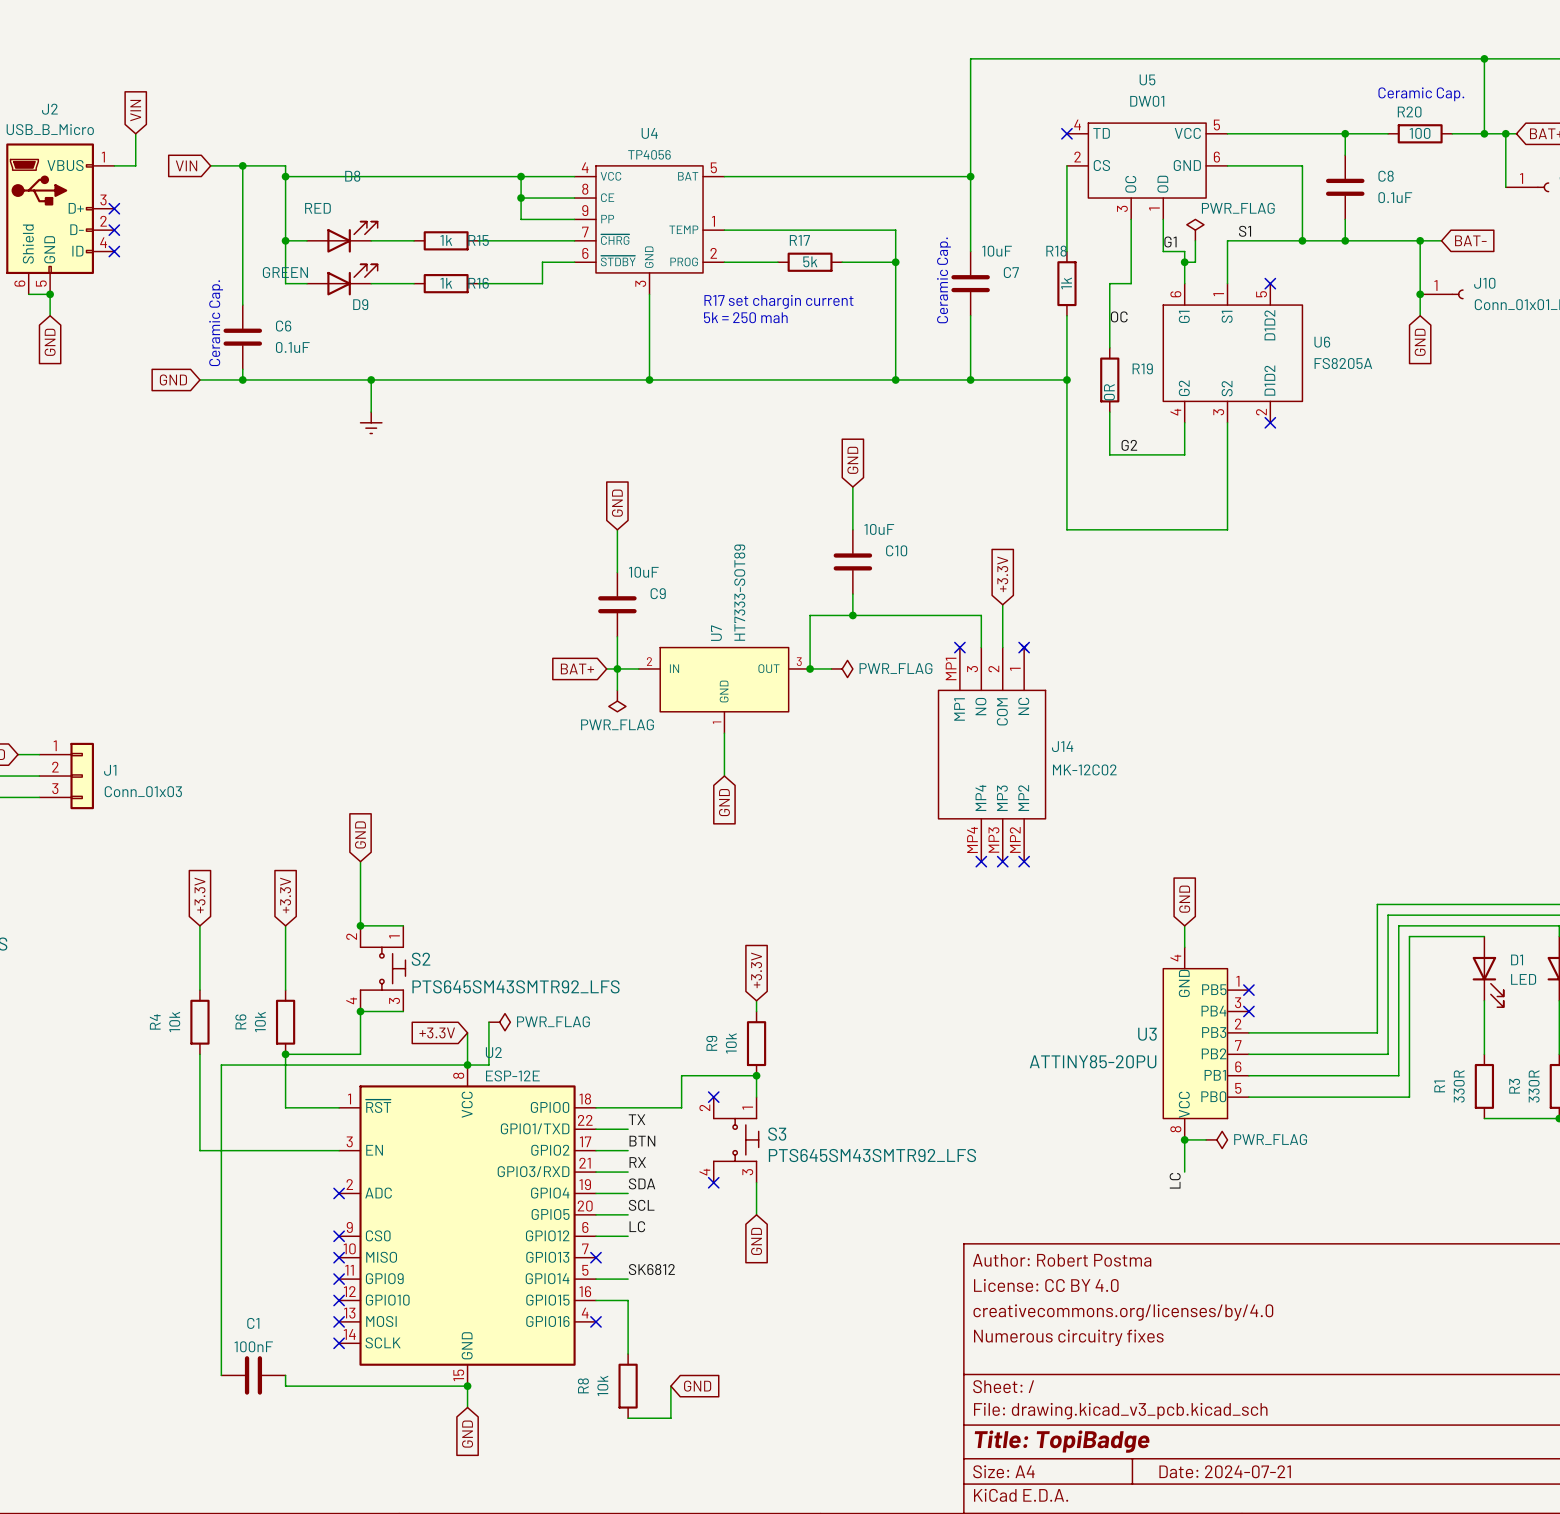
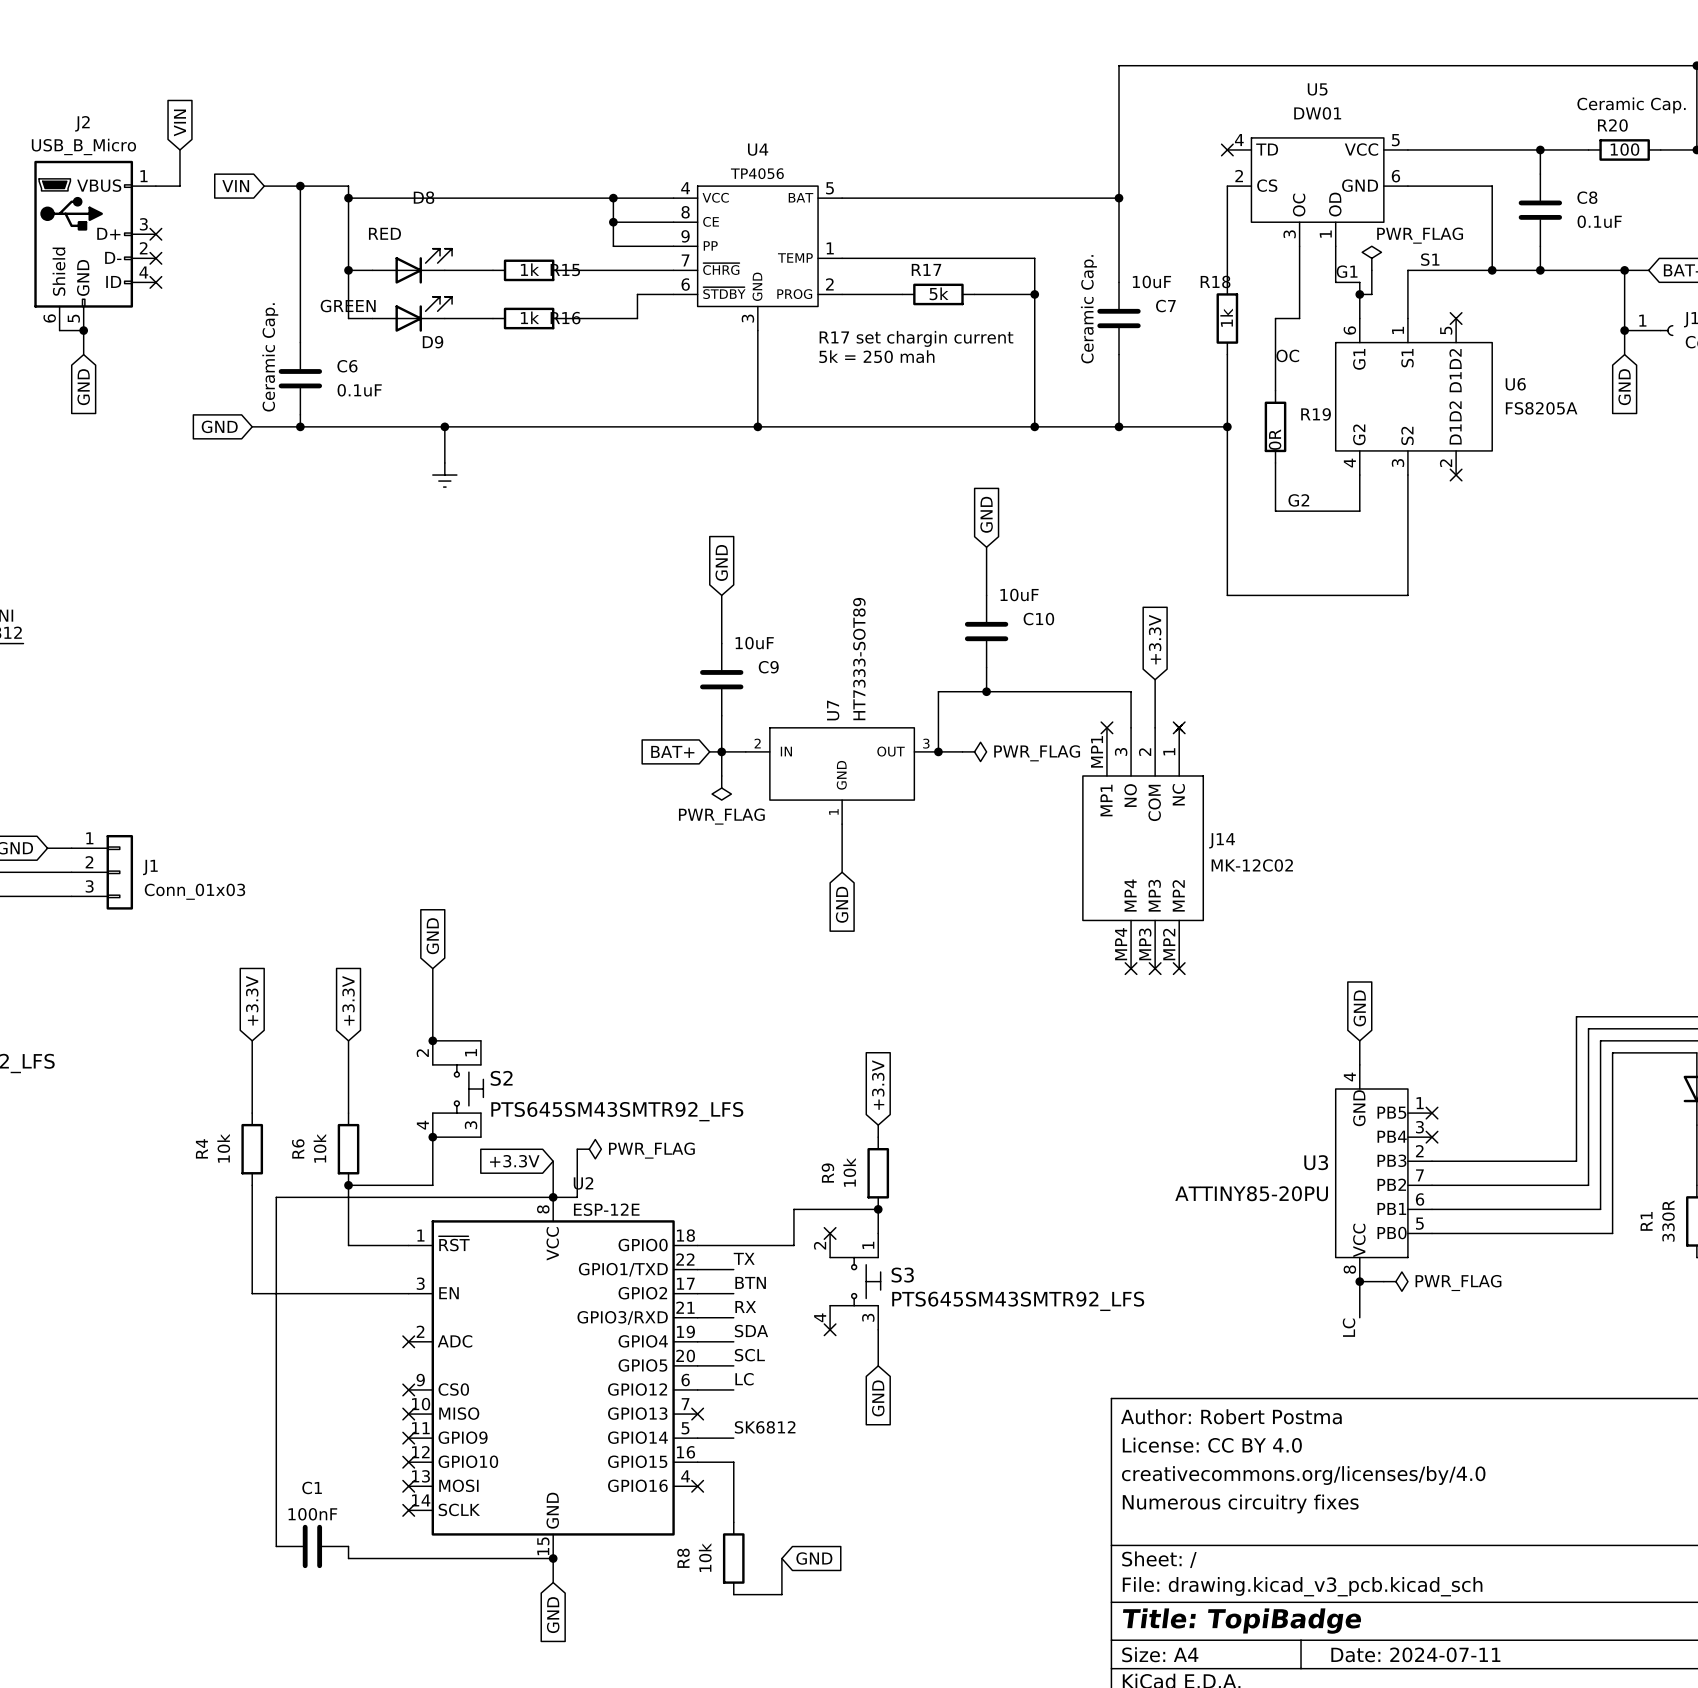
title block: Date: 2024-07-21 (1225, 1471) -> Date: 2024-07-11 (1415, 1654)

